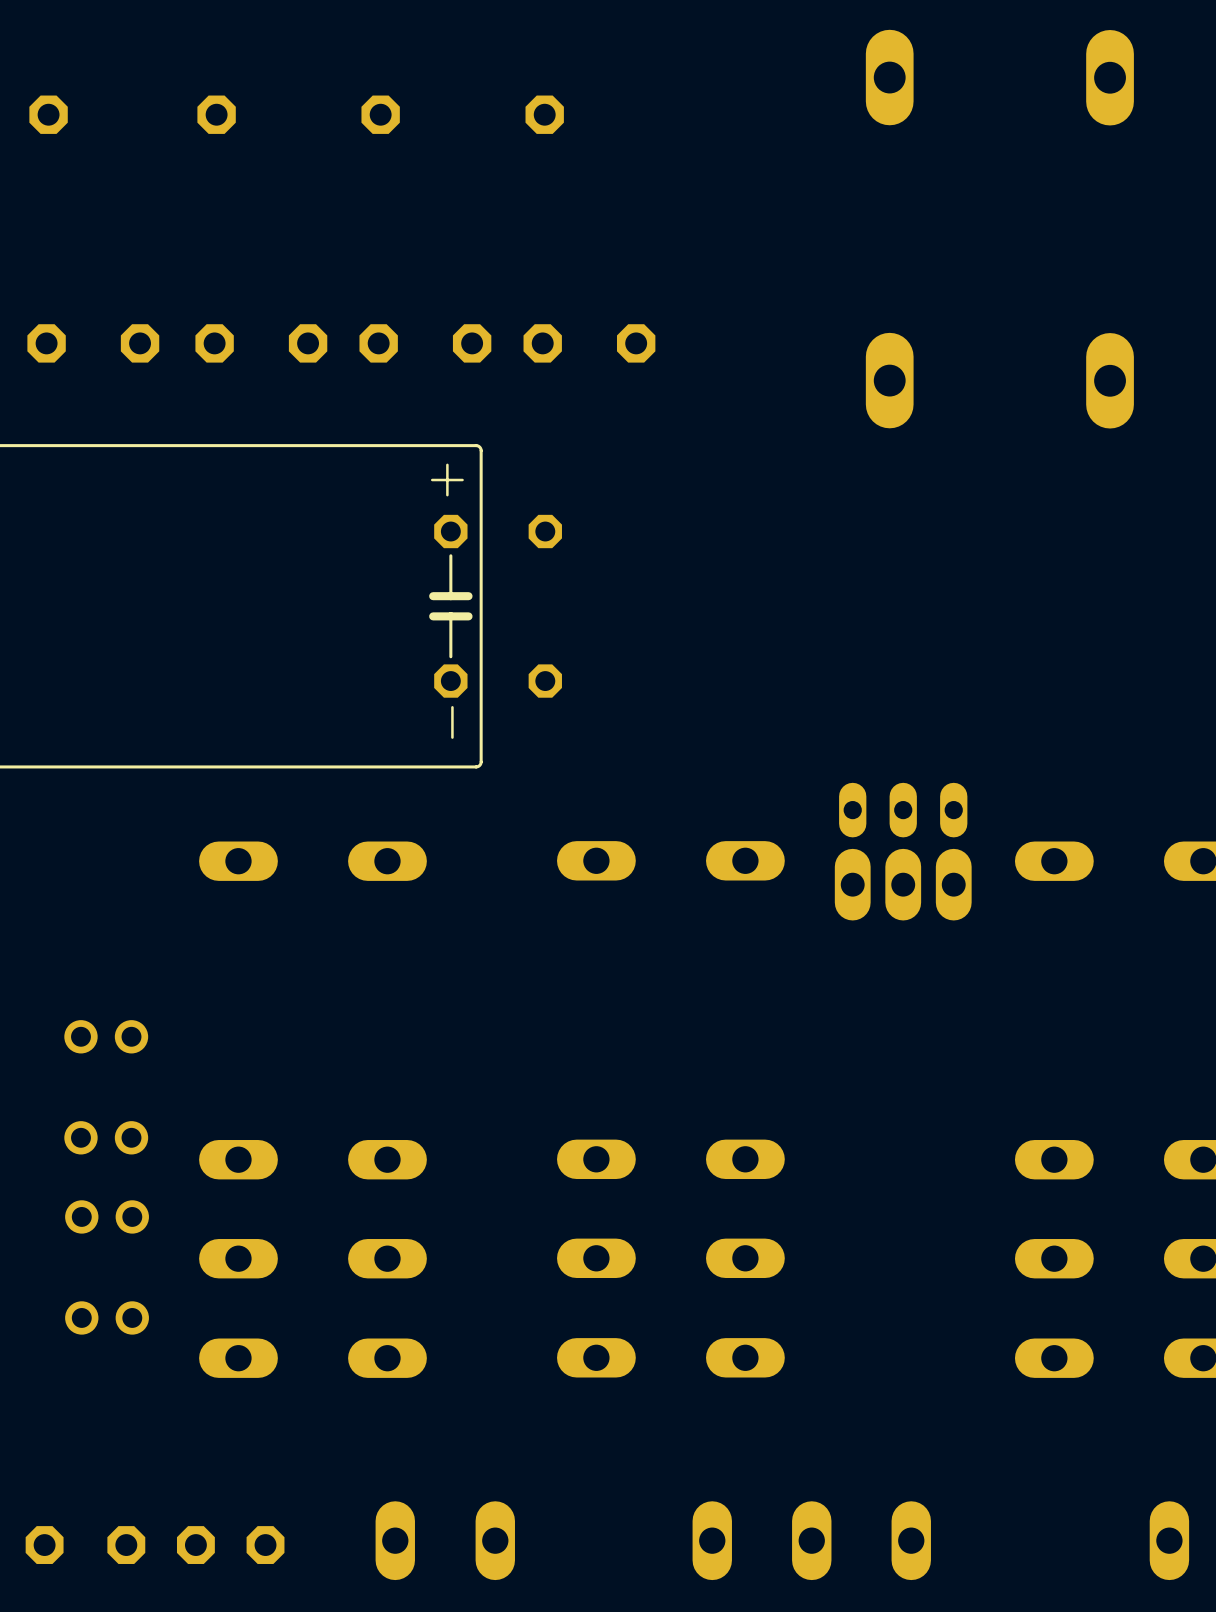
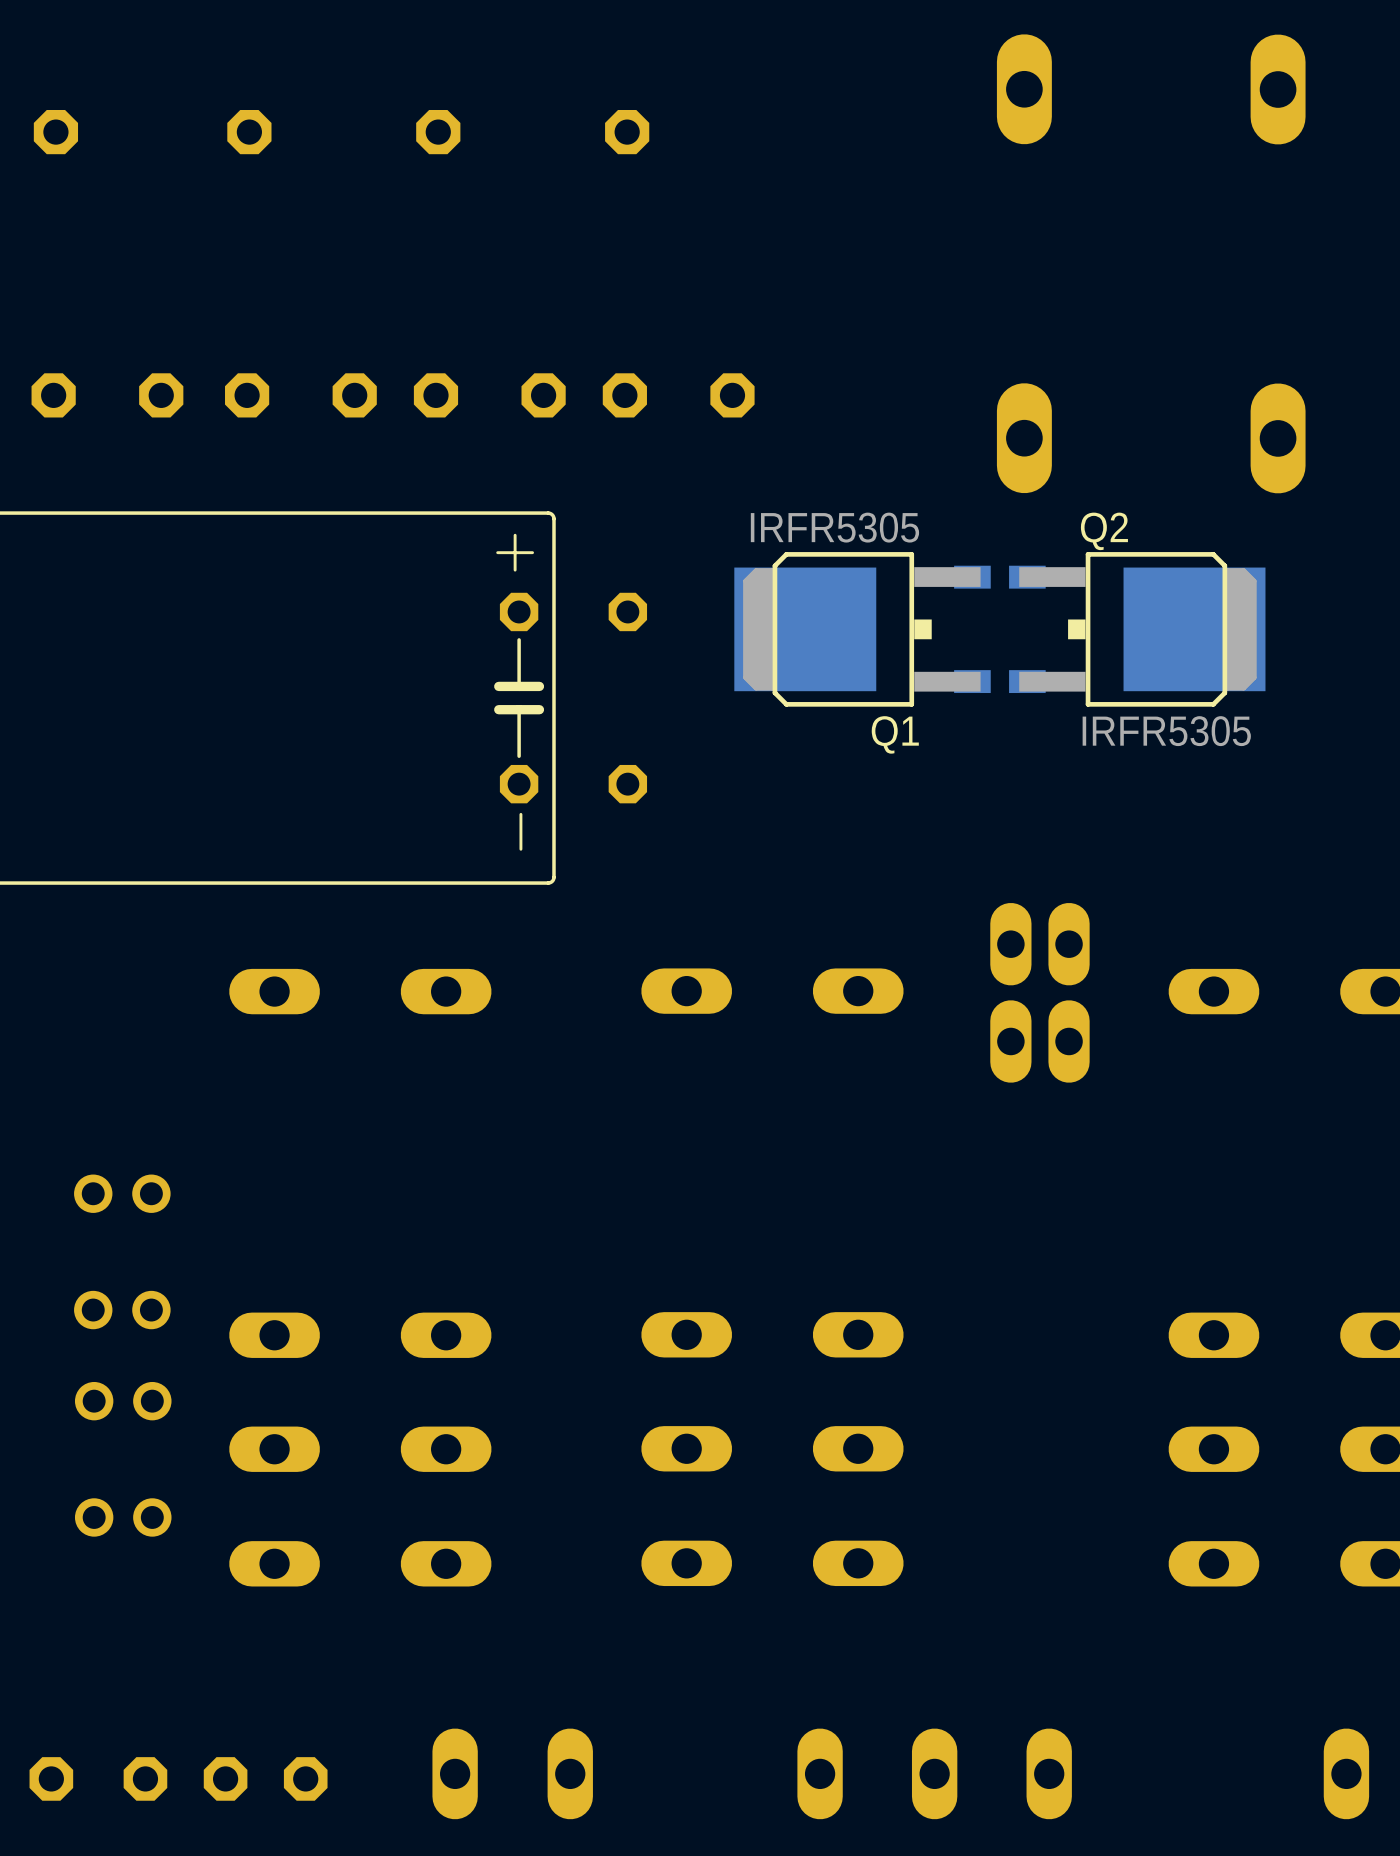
Q1: none -> IRFR5305 (862, 629)
Q2: none -> IRFR5305 (1137, 629)
part footprint: [839, 782, 968, 838] -> [990, 902, 1090, 986]
part footprint: [834, 848, 972, 921] -> [990, 1000, 1090, 1083]

